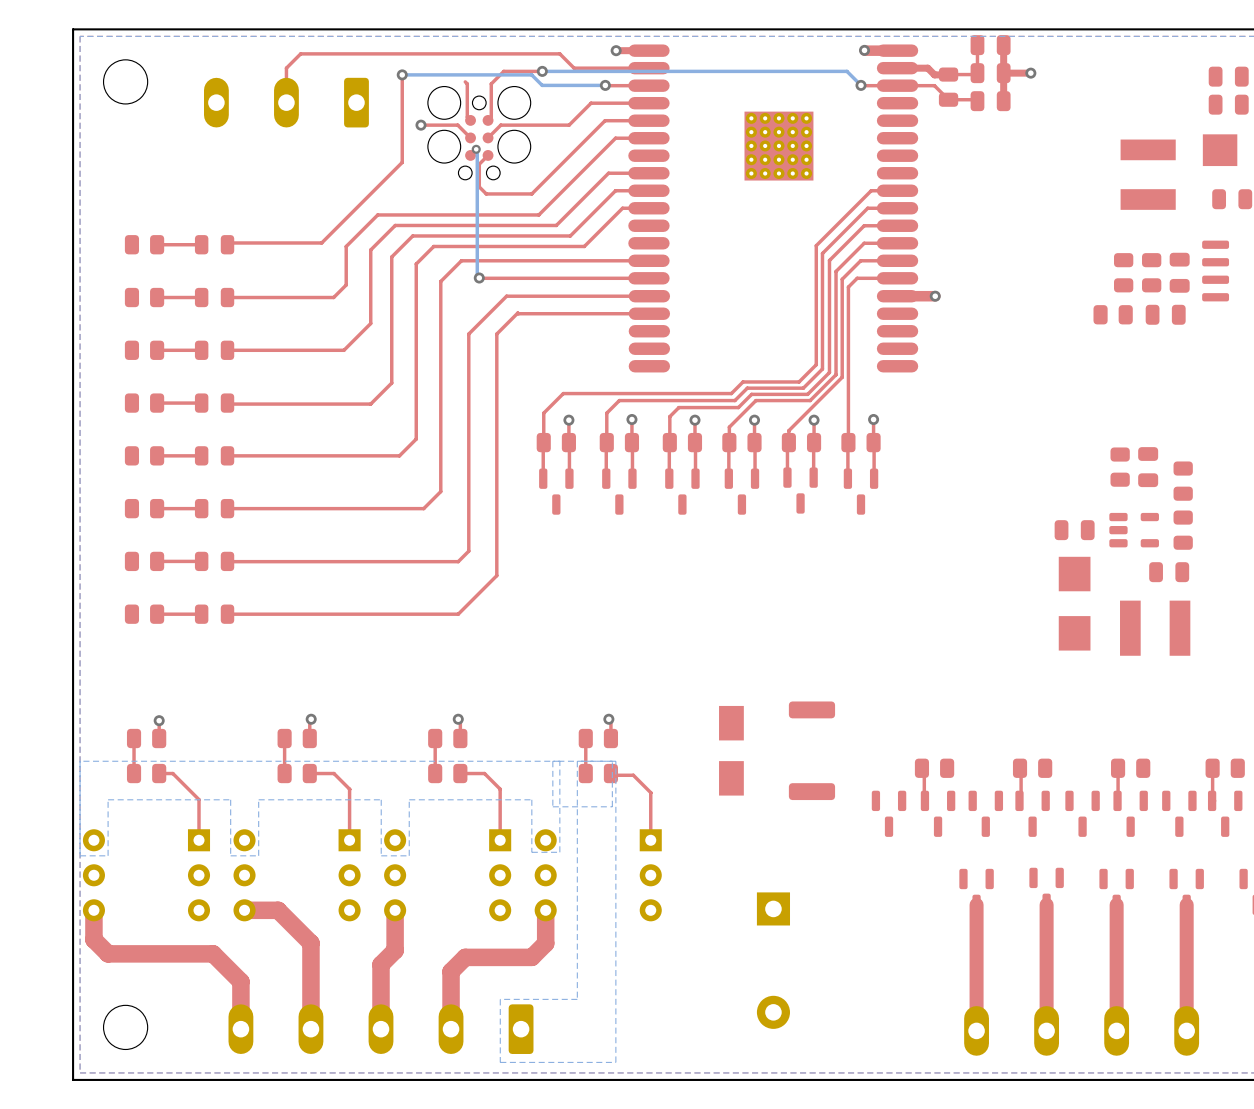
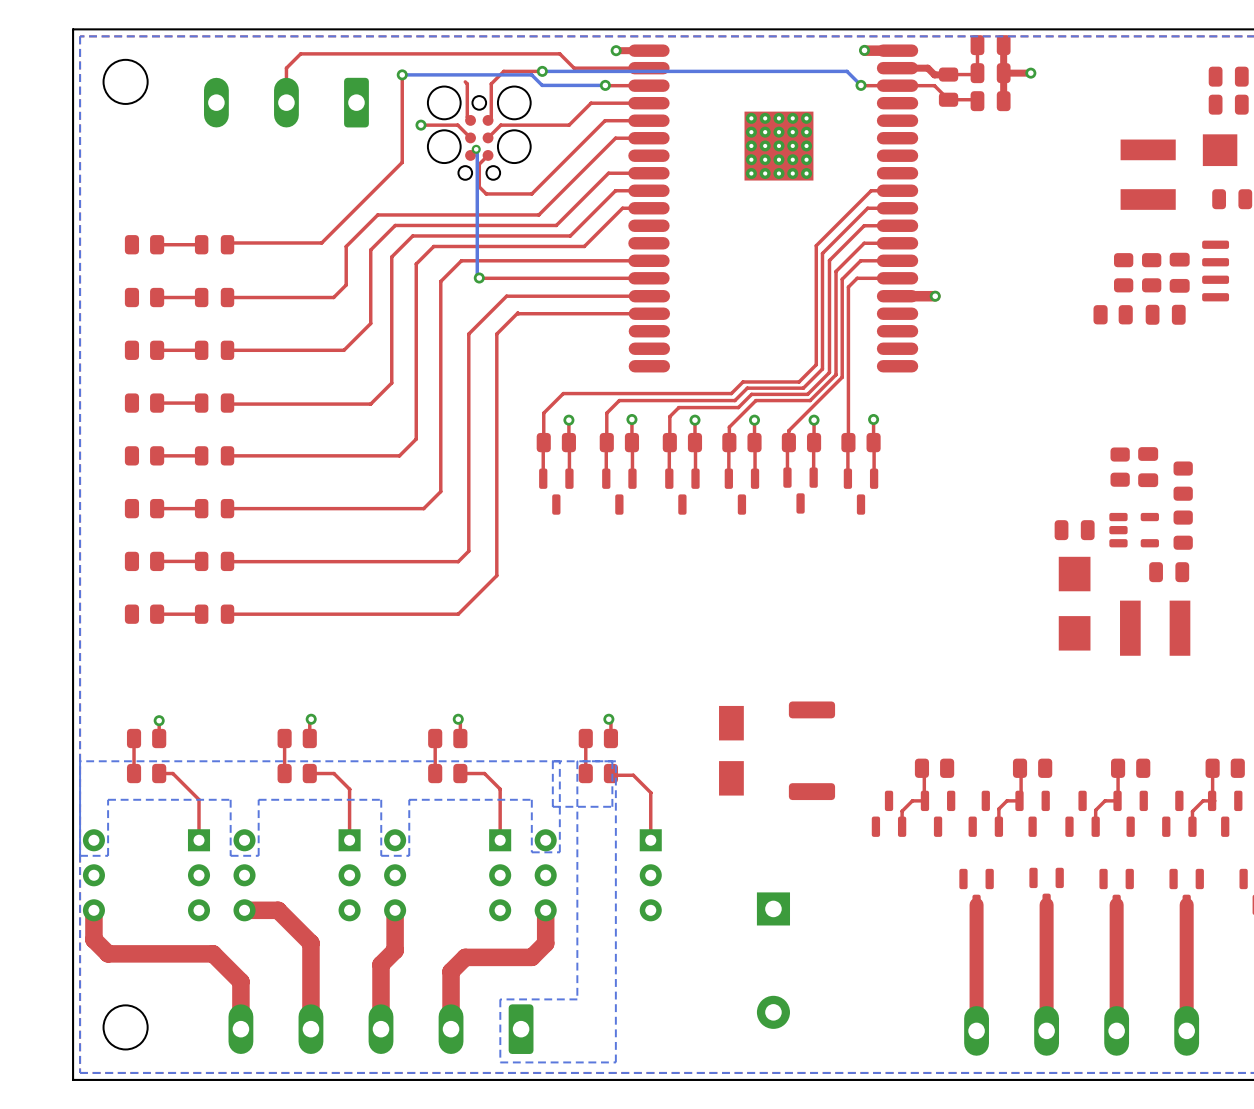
top track: none -> (924, 800) (912, 800) (902, 811) (902, 826)
top track: none -> (1021, 800) (1007, 800) (998, 808) (998, 826)
top track: none -> (1117, 800) (1105, 800) (1095, 810) (1095, 826)
top track: none -> (1214, 800) (1203, 800) (1192, 811) (1192, 826)
part rotation: 0° (889, 813) -> 180° (889, 813)
part rotation: 0° (985, 813) -> 180° (985, 813)
part rotation: 0° (1082, 813) -> 180° (1082, 813)
part rotation: 0° (1179, 813) -> 180° (1179, 813)

